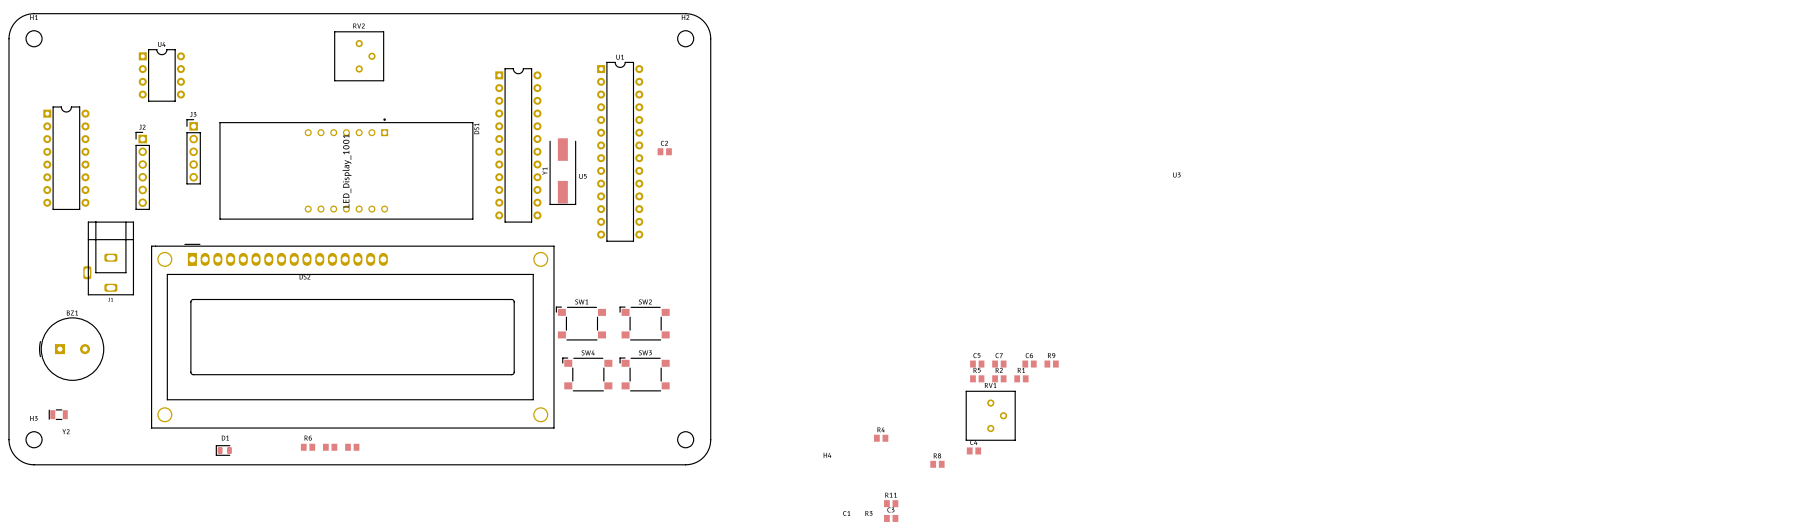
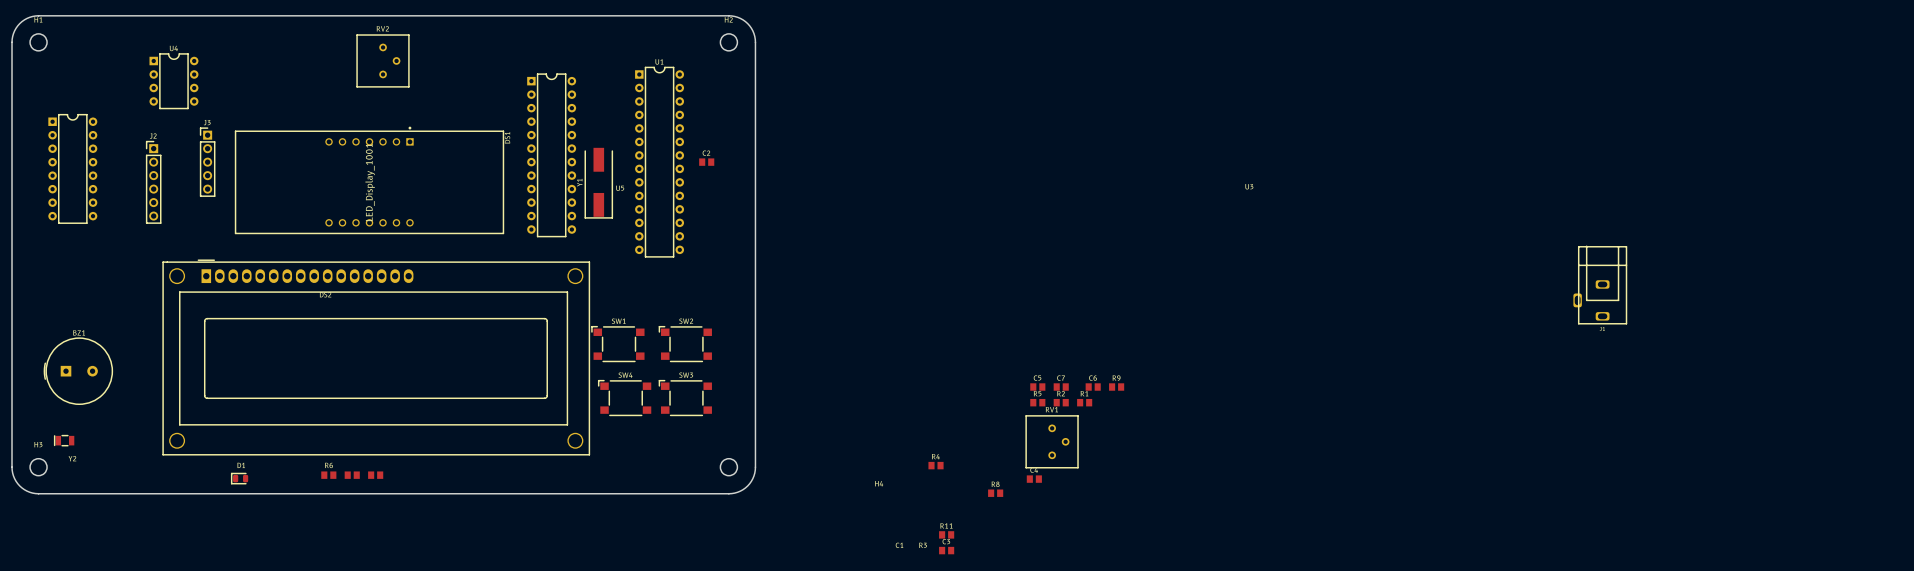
part position: (108, 258) -> (1600, 285)

